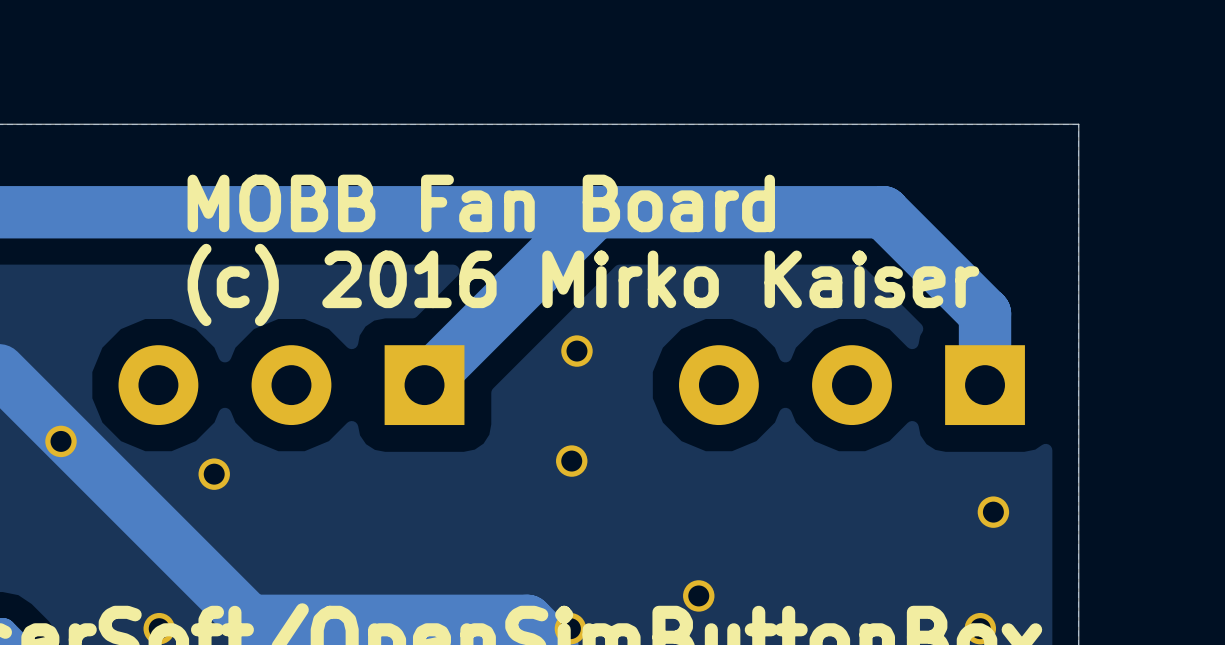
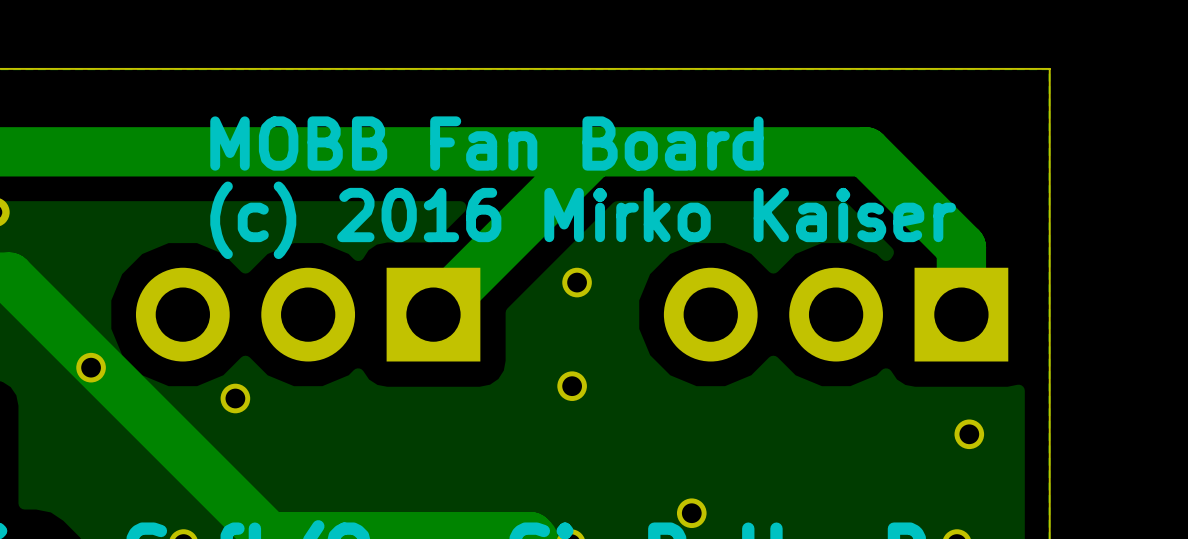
part footprint: [118, 345, 465, 426] -> [135, 267, 481, 362]
part footprint: [679, 345, 1025, 426] -> [663, 267, 1009, 362]

